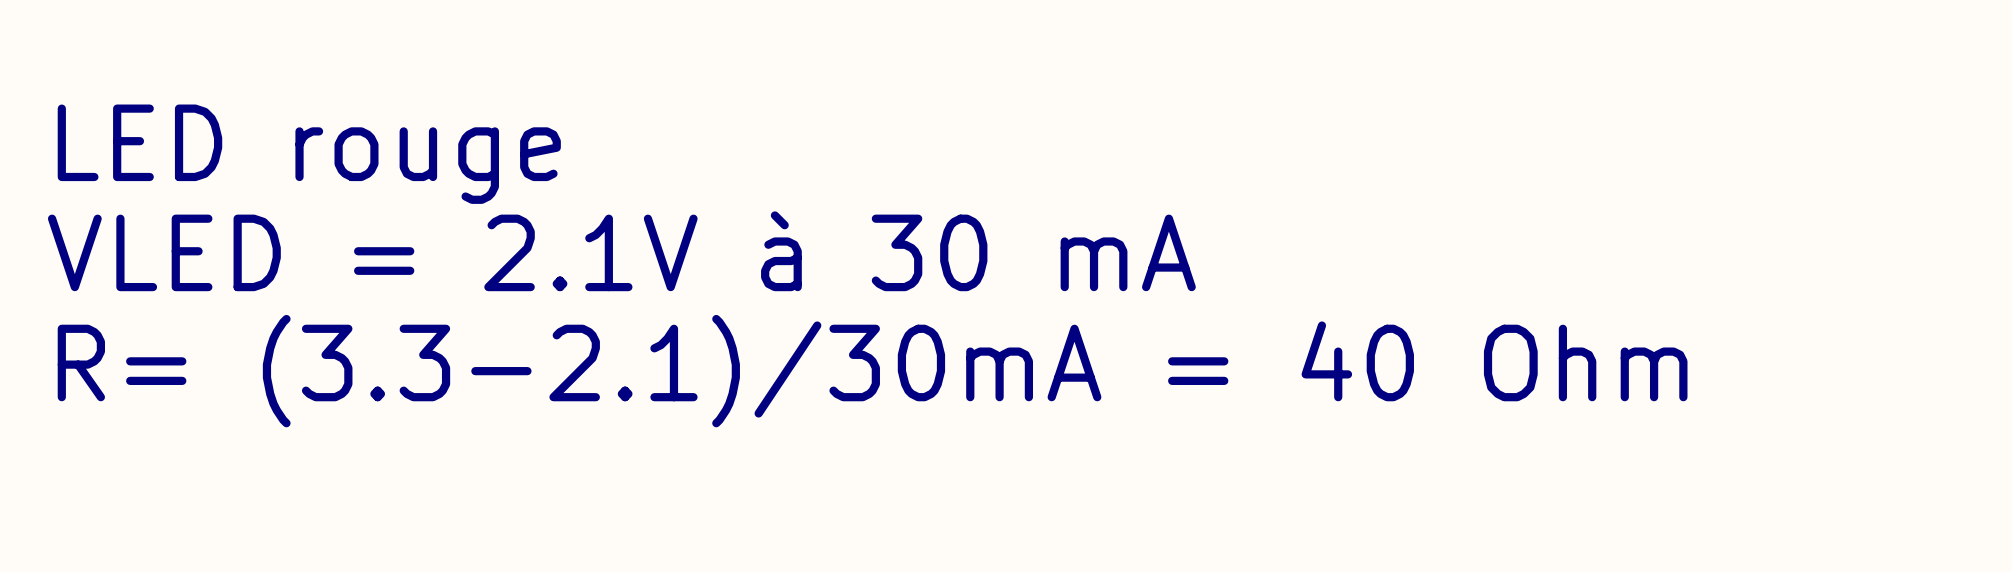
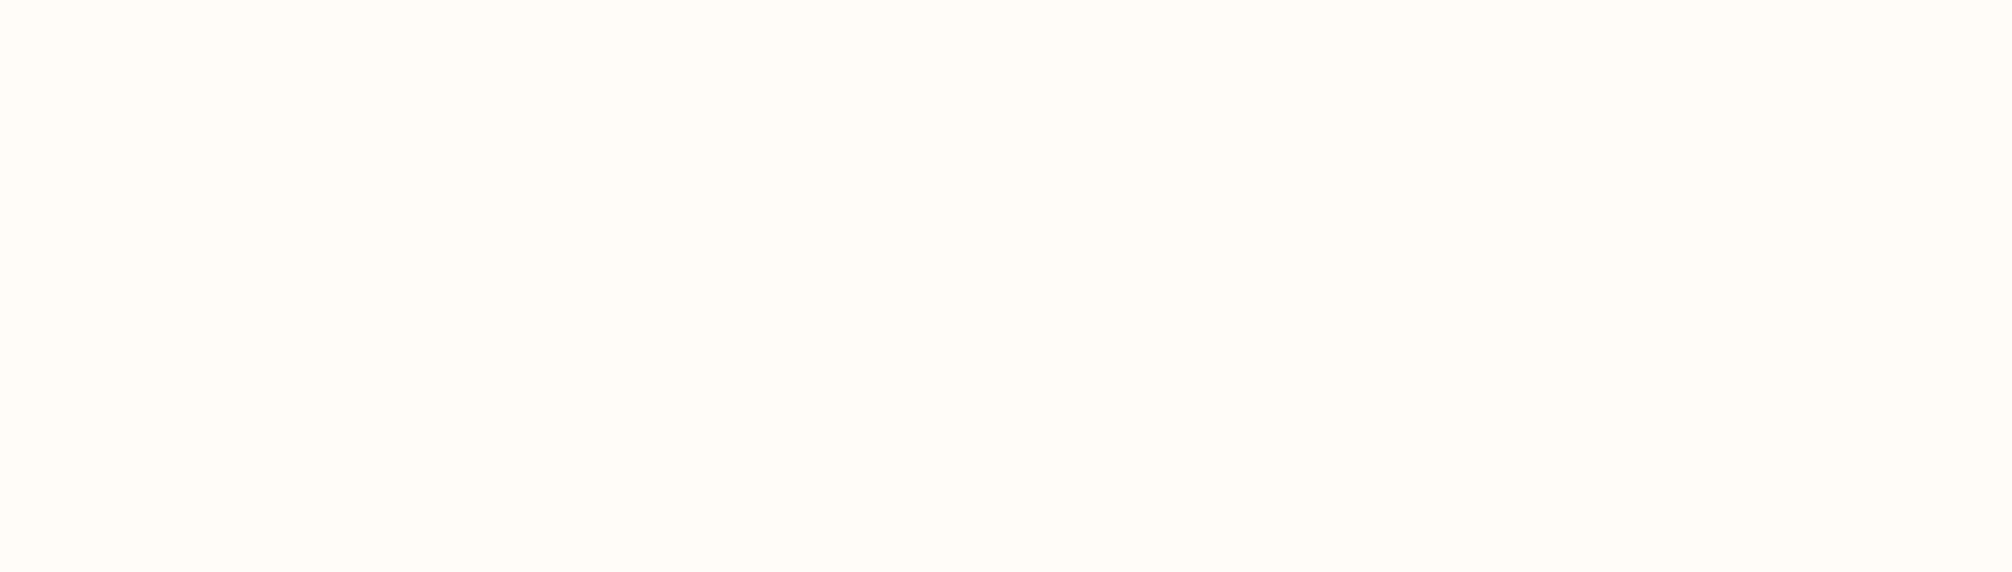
text: LED rouge (309, 154) -> none
text: VLED = 2.1V à 30 mA (621, 251) -> none
text: R= (3.3-2.1)/30mA = 40 Ohm (872, 371) -> none

